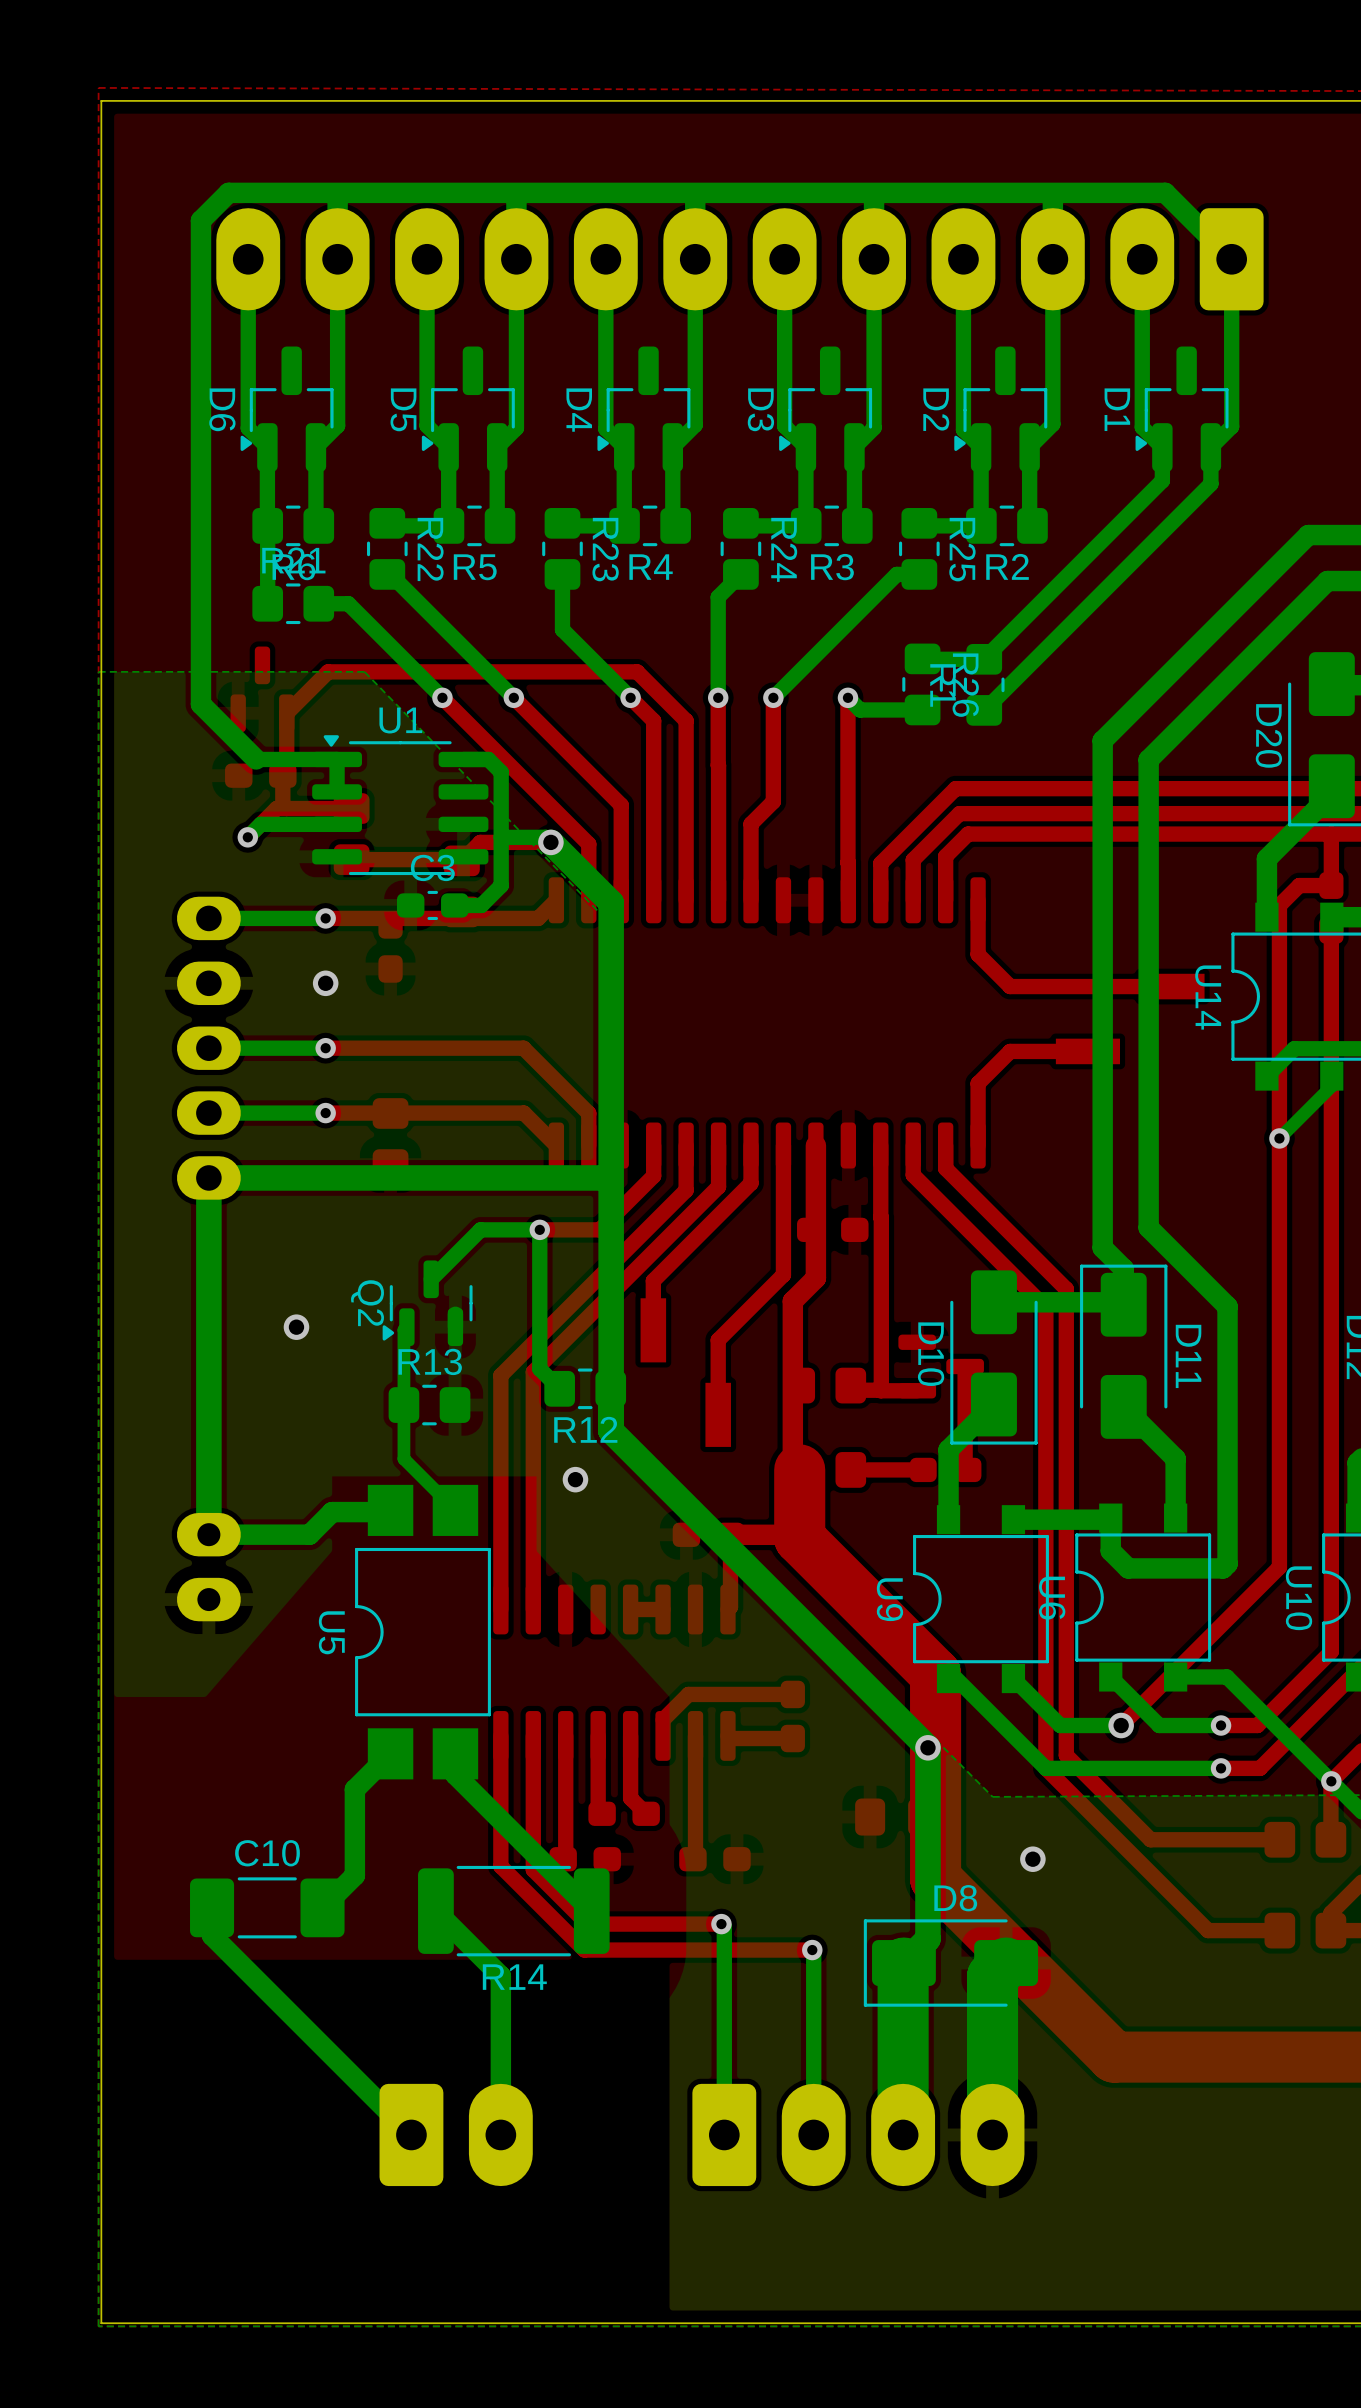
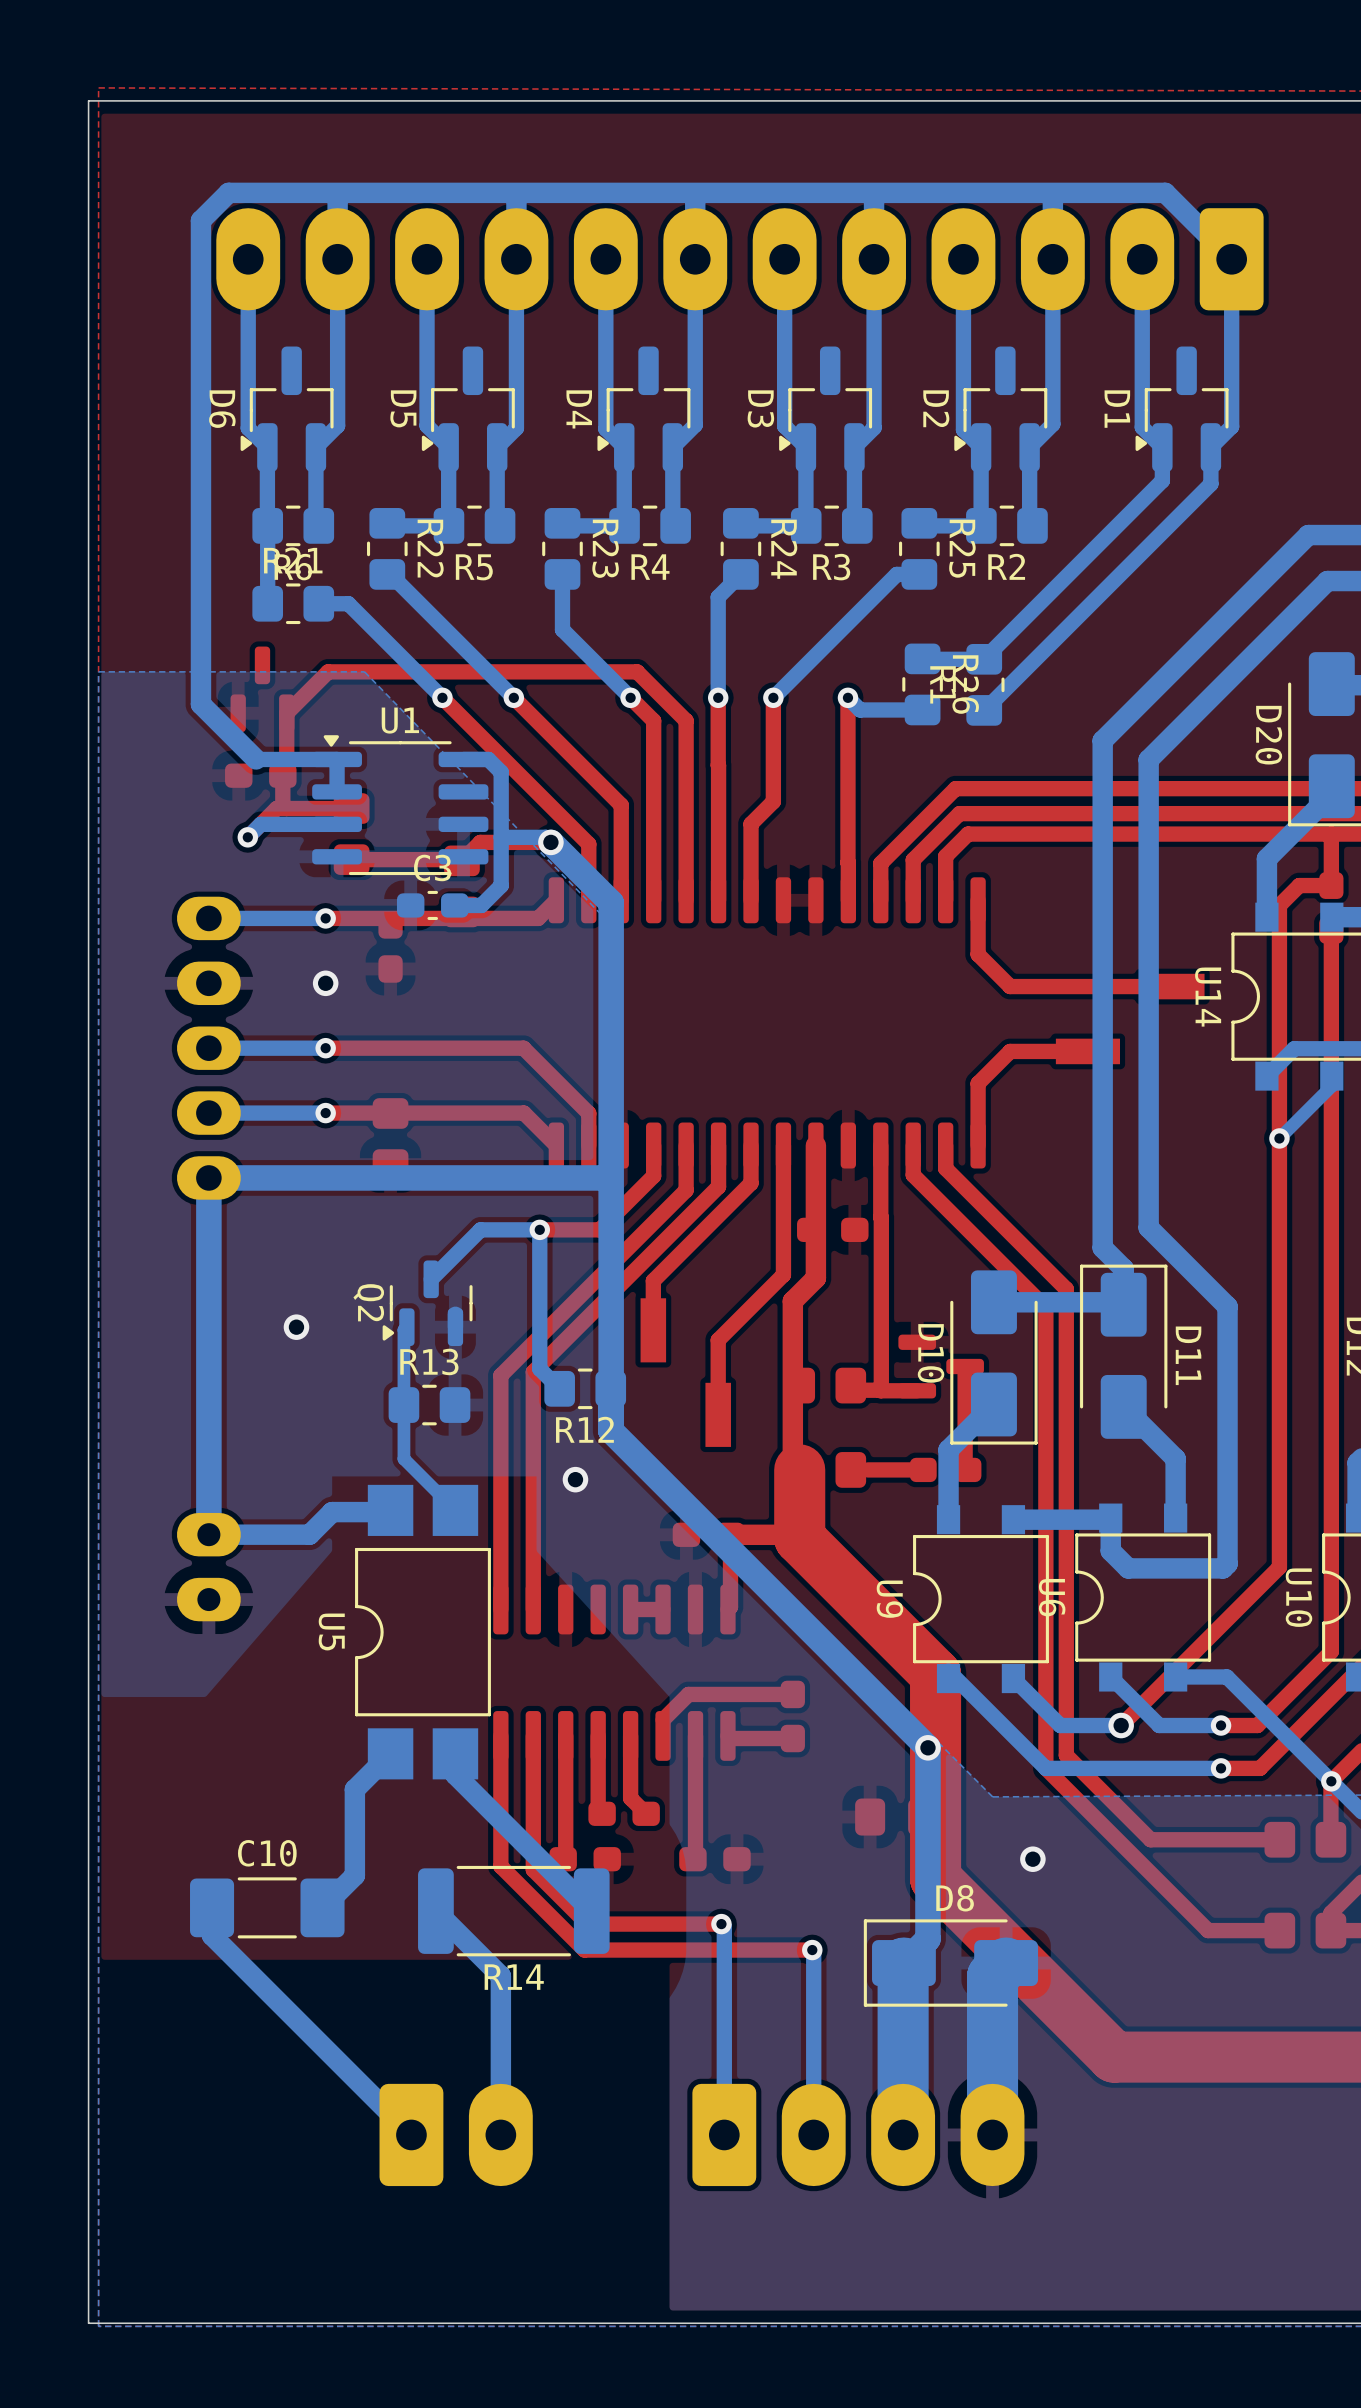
board edge: (101, 100) (101, 2323) -> (101, 100) (88, 100) (88, 2323) (101, 2323)

